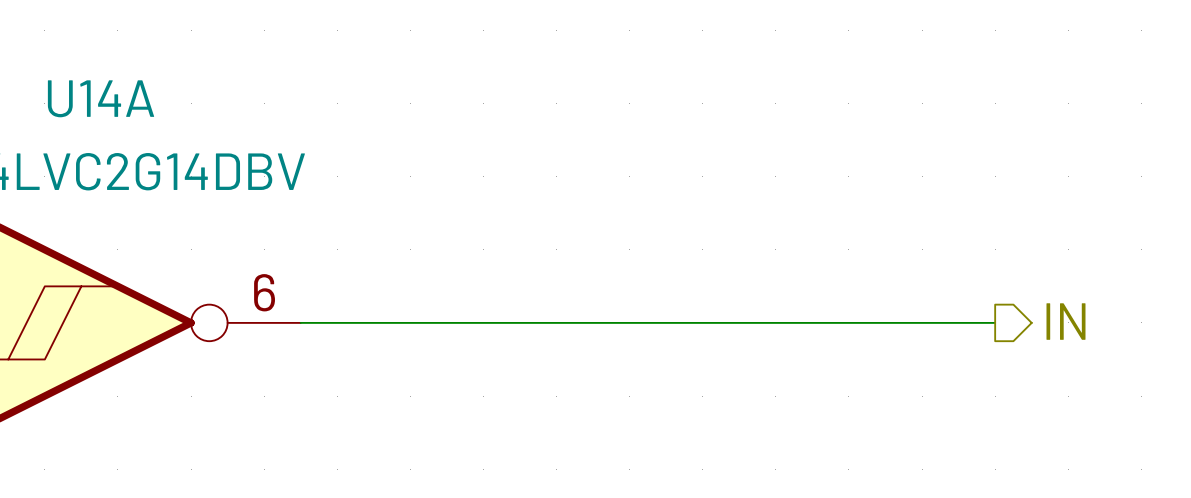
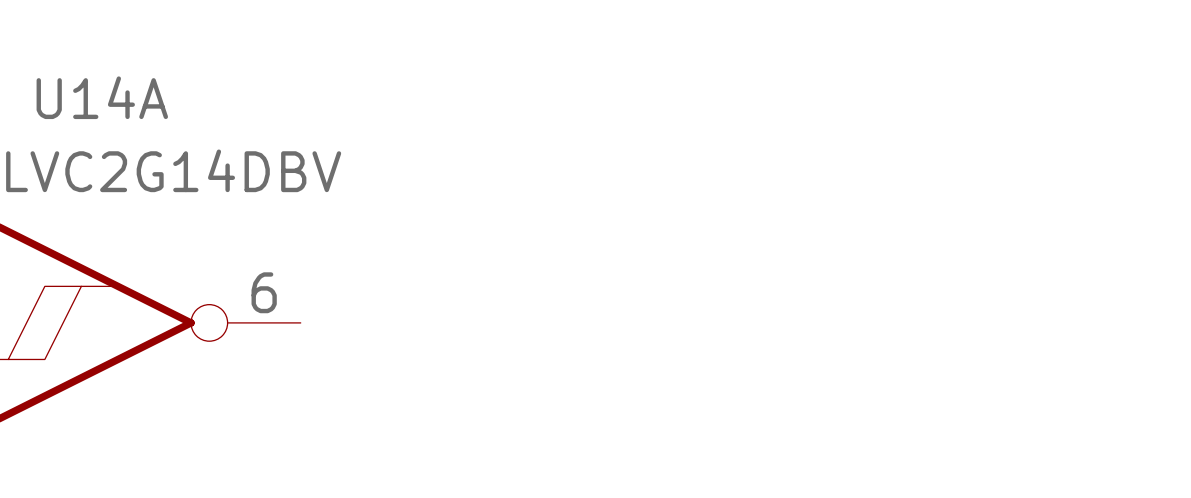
hierarchical label: IN (1065, 321) -> none
wire: (300, 322) (995, 322) -> none

